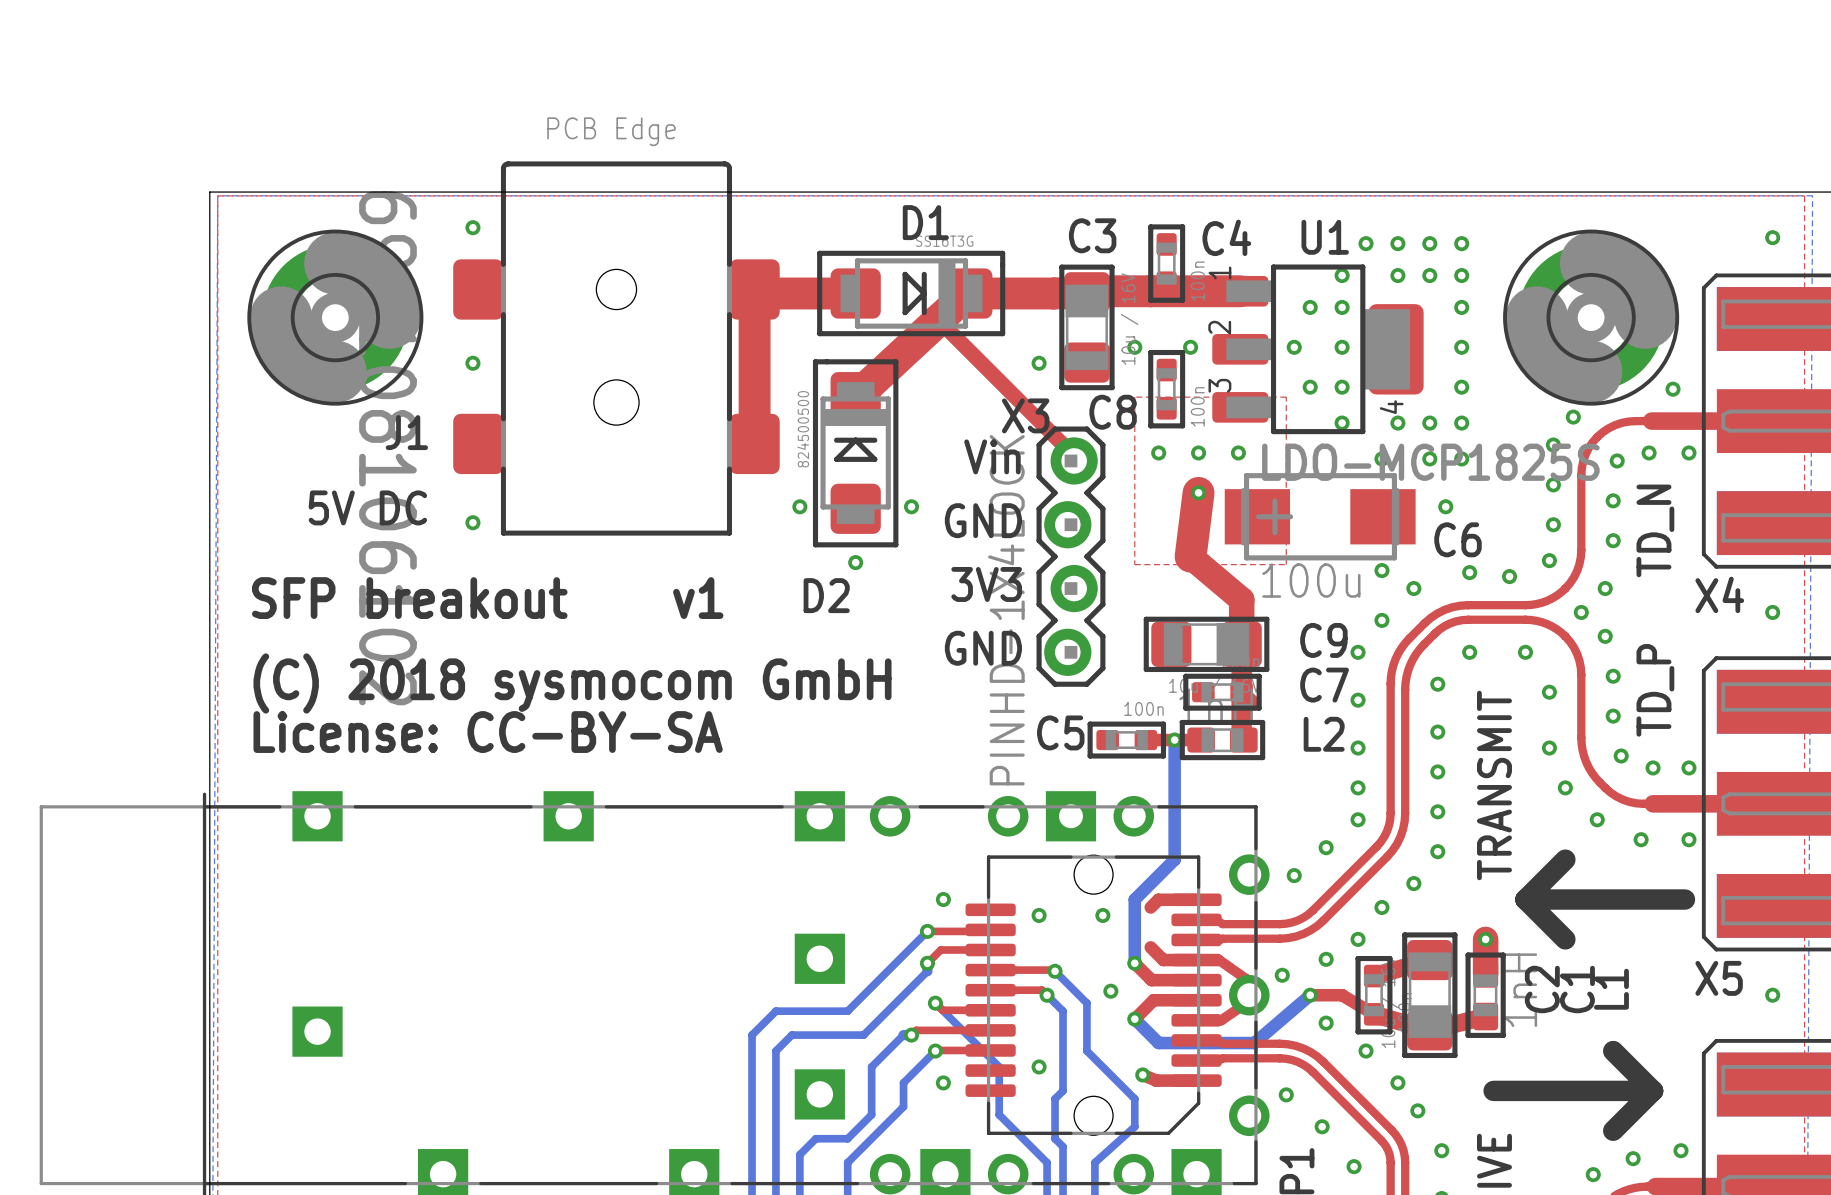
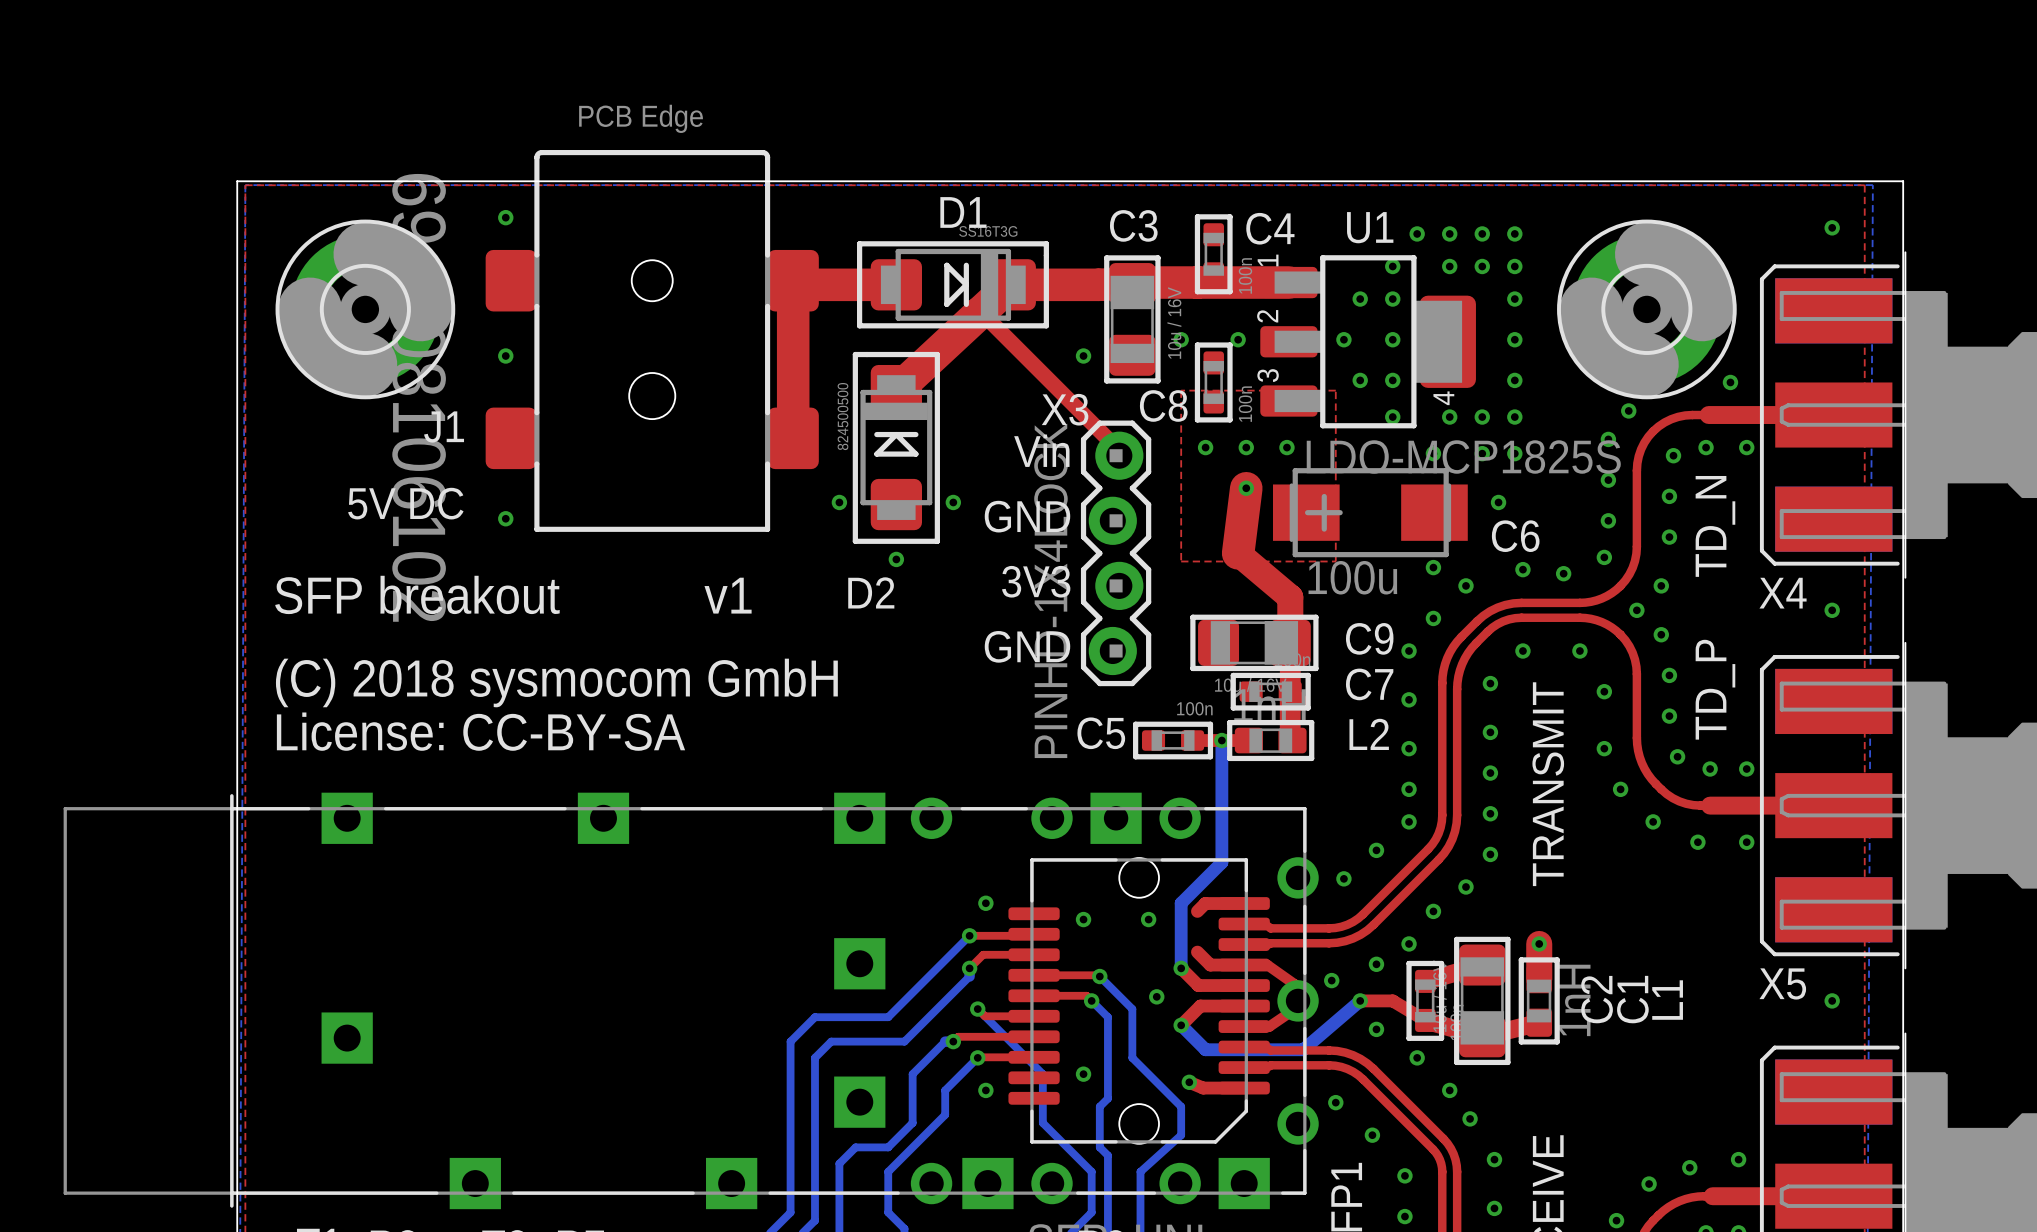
line: (1565, 859) (1525, 899) -> none
line: (1525, 899) (1684, 899) -> none
line: (1525, 899) (1565, 939) -> none
line: (1613, 1051) (1653, 1090) -> none
line: (1493, 1090) (1653, 1090) -> none
line: (1653, 1090) (1613, 1130) -> none

